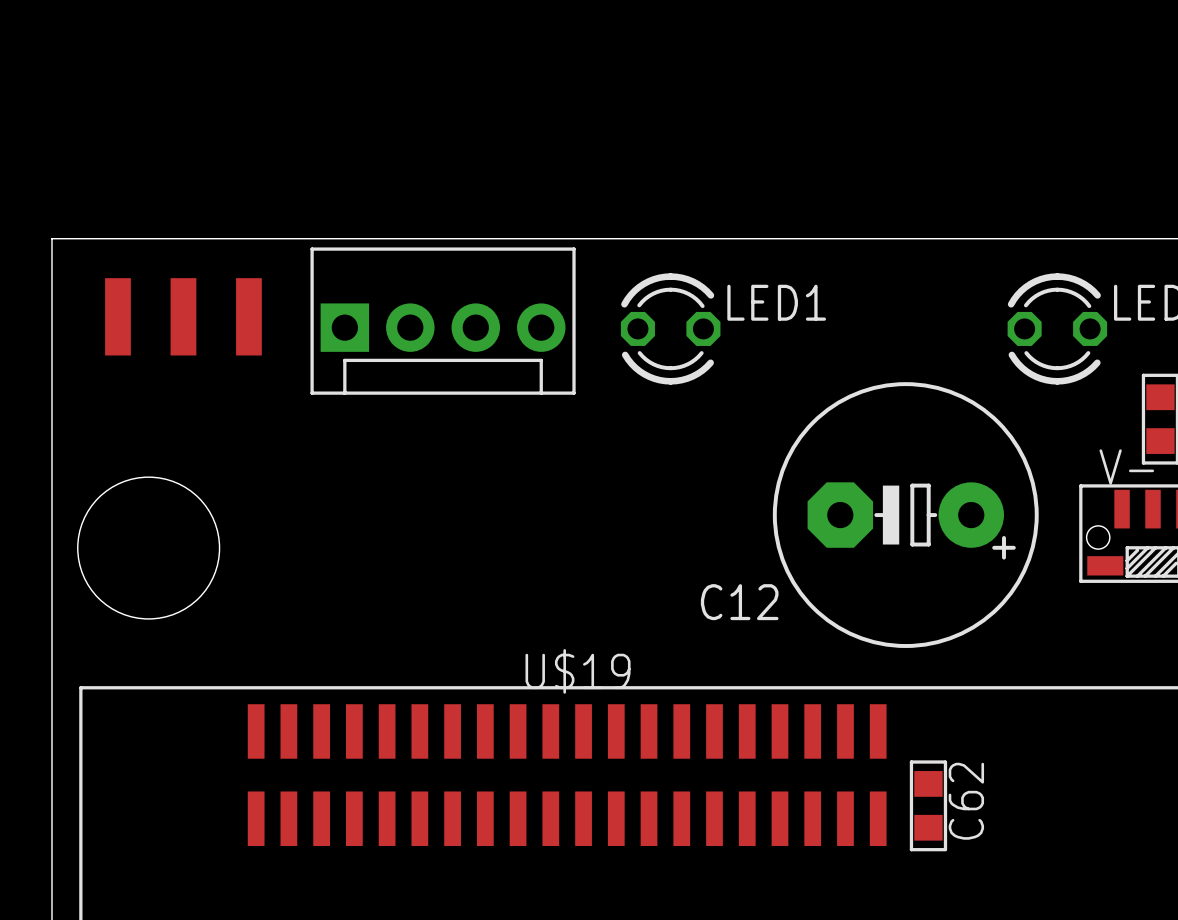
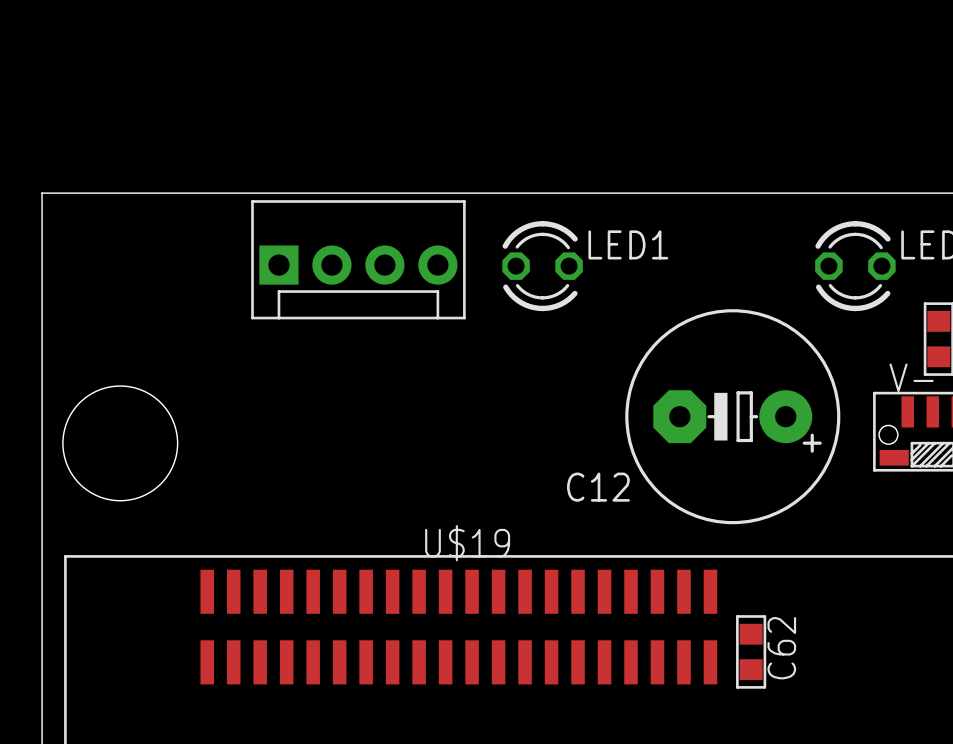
part: (183, 316) -> none

